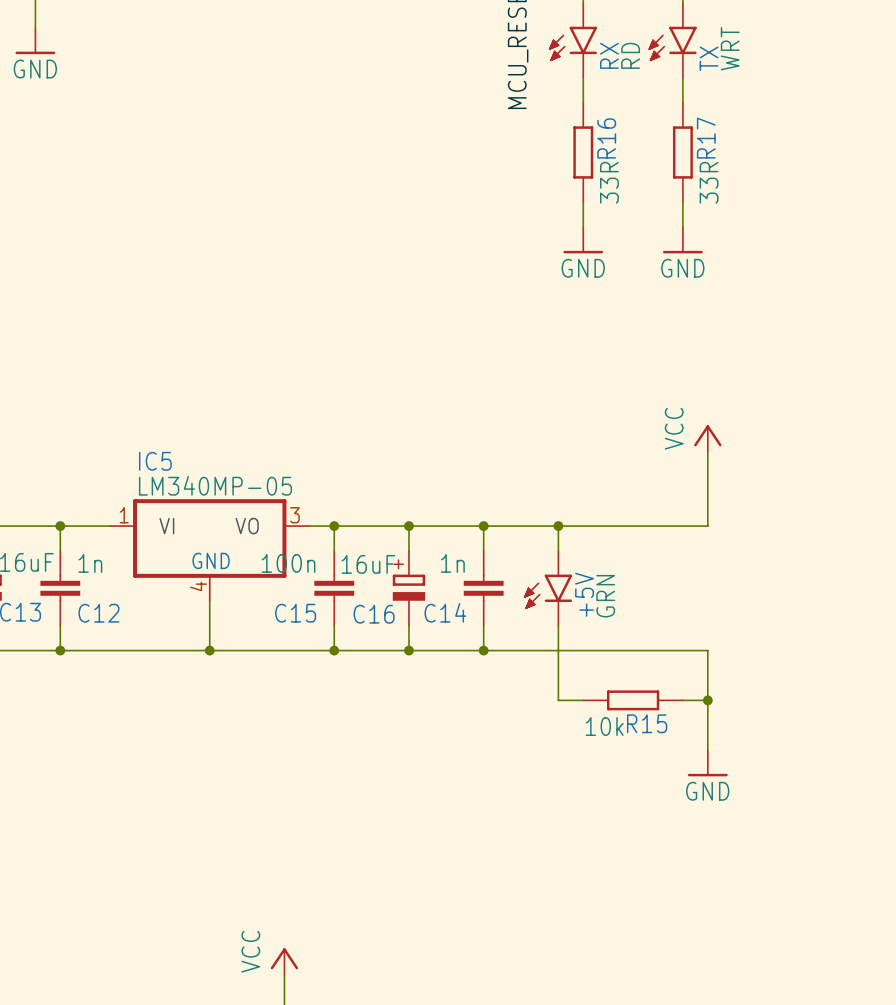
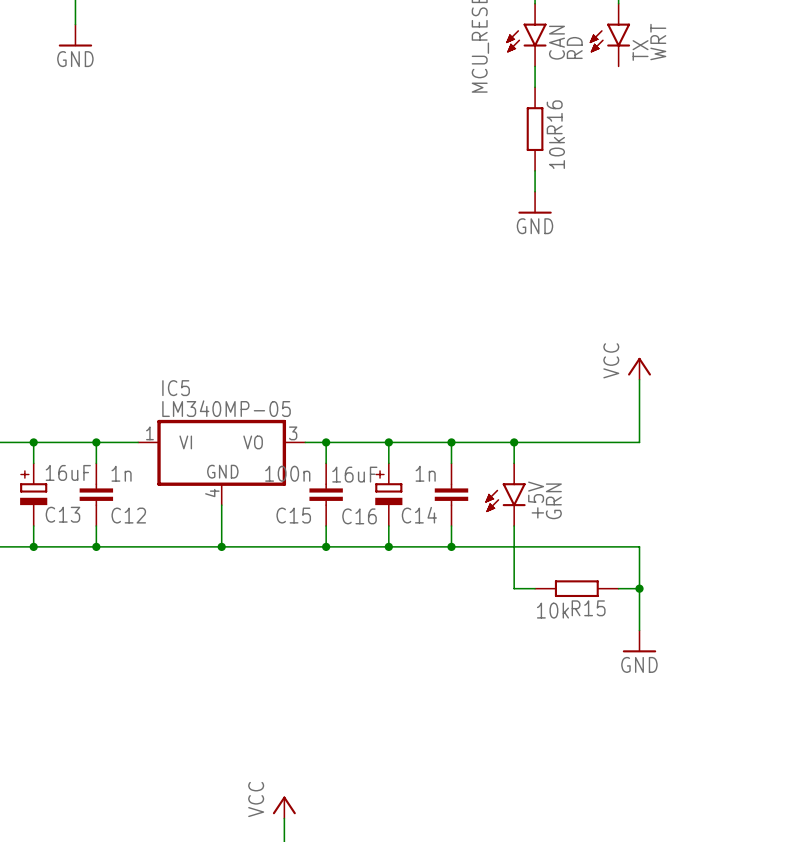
RX name: RX (609, 55) -> CAN (556, 42)
wire: (682, 77) (682, 102) -> none
R17: 33R (682, 152) -> none
R16 value: 33R (609, 182) -> 10k (556, 152)
wire: (682, 202) (682, 227) -> none
power symbol: GND (682, 240) -> none

